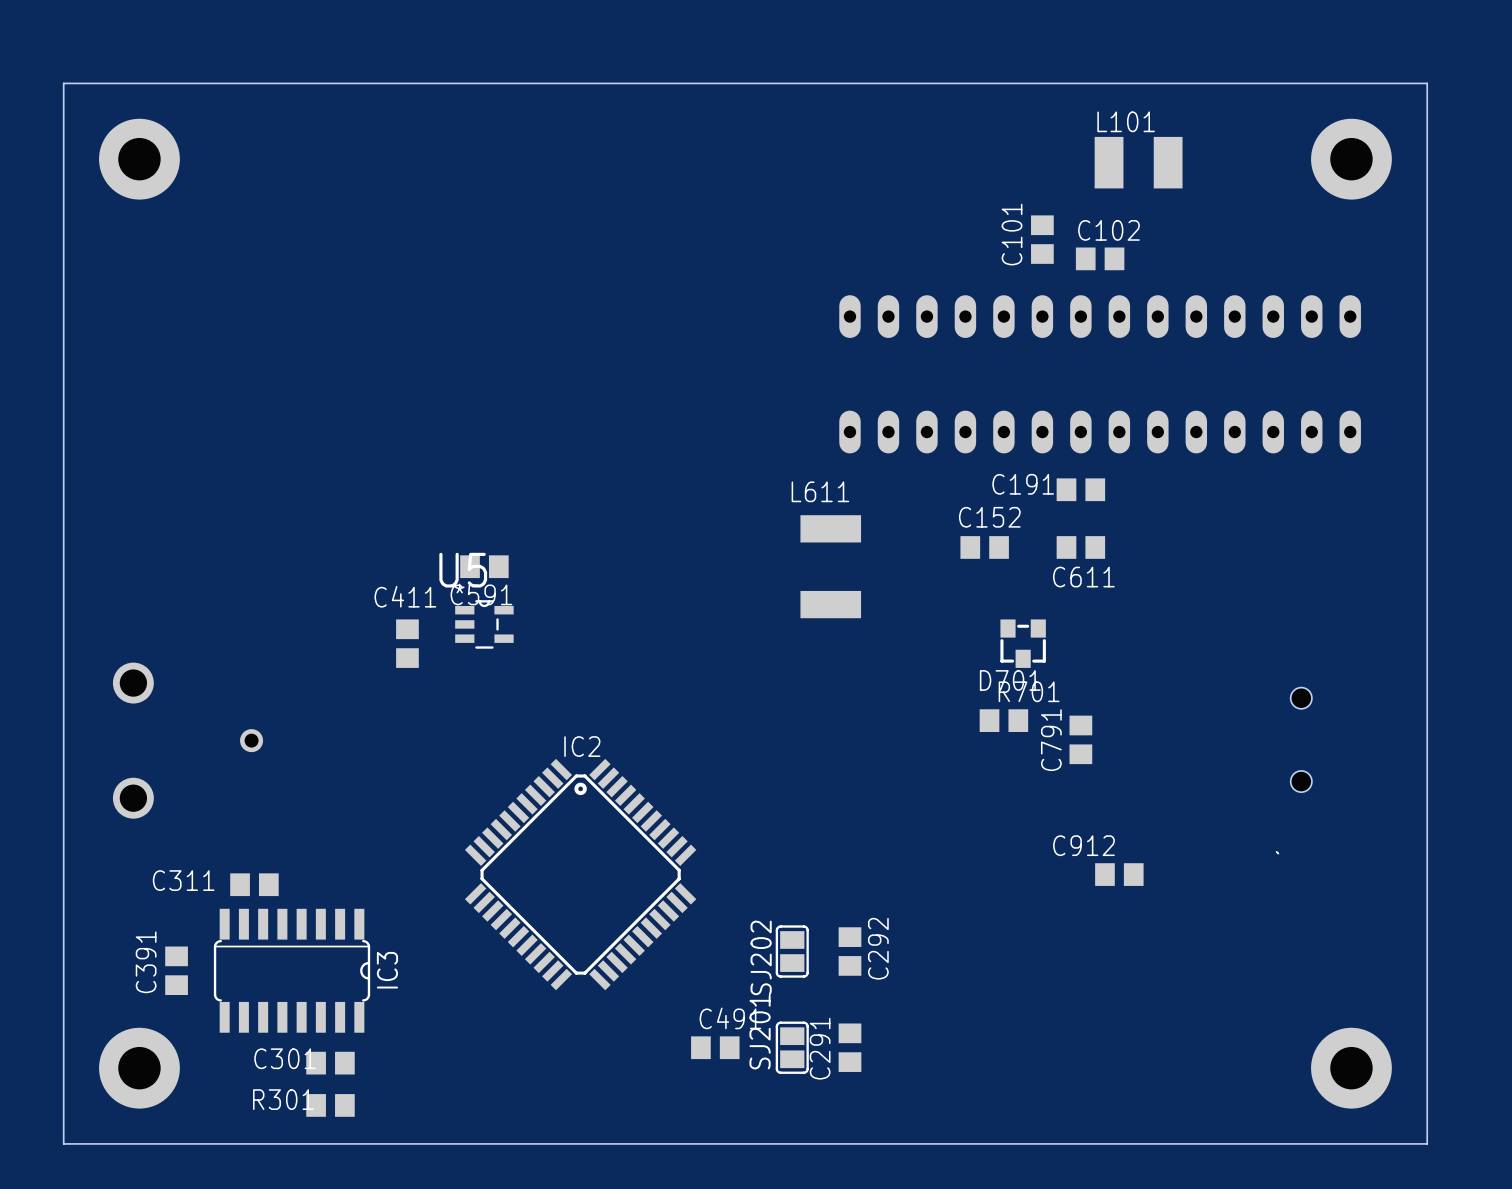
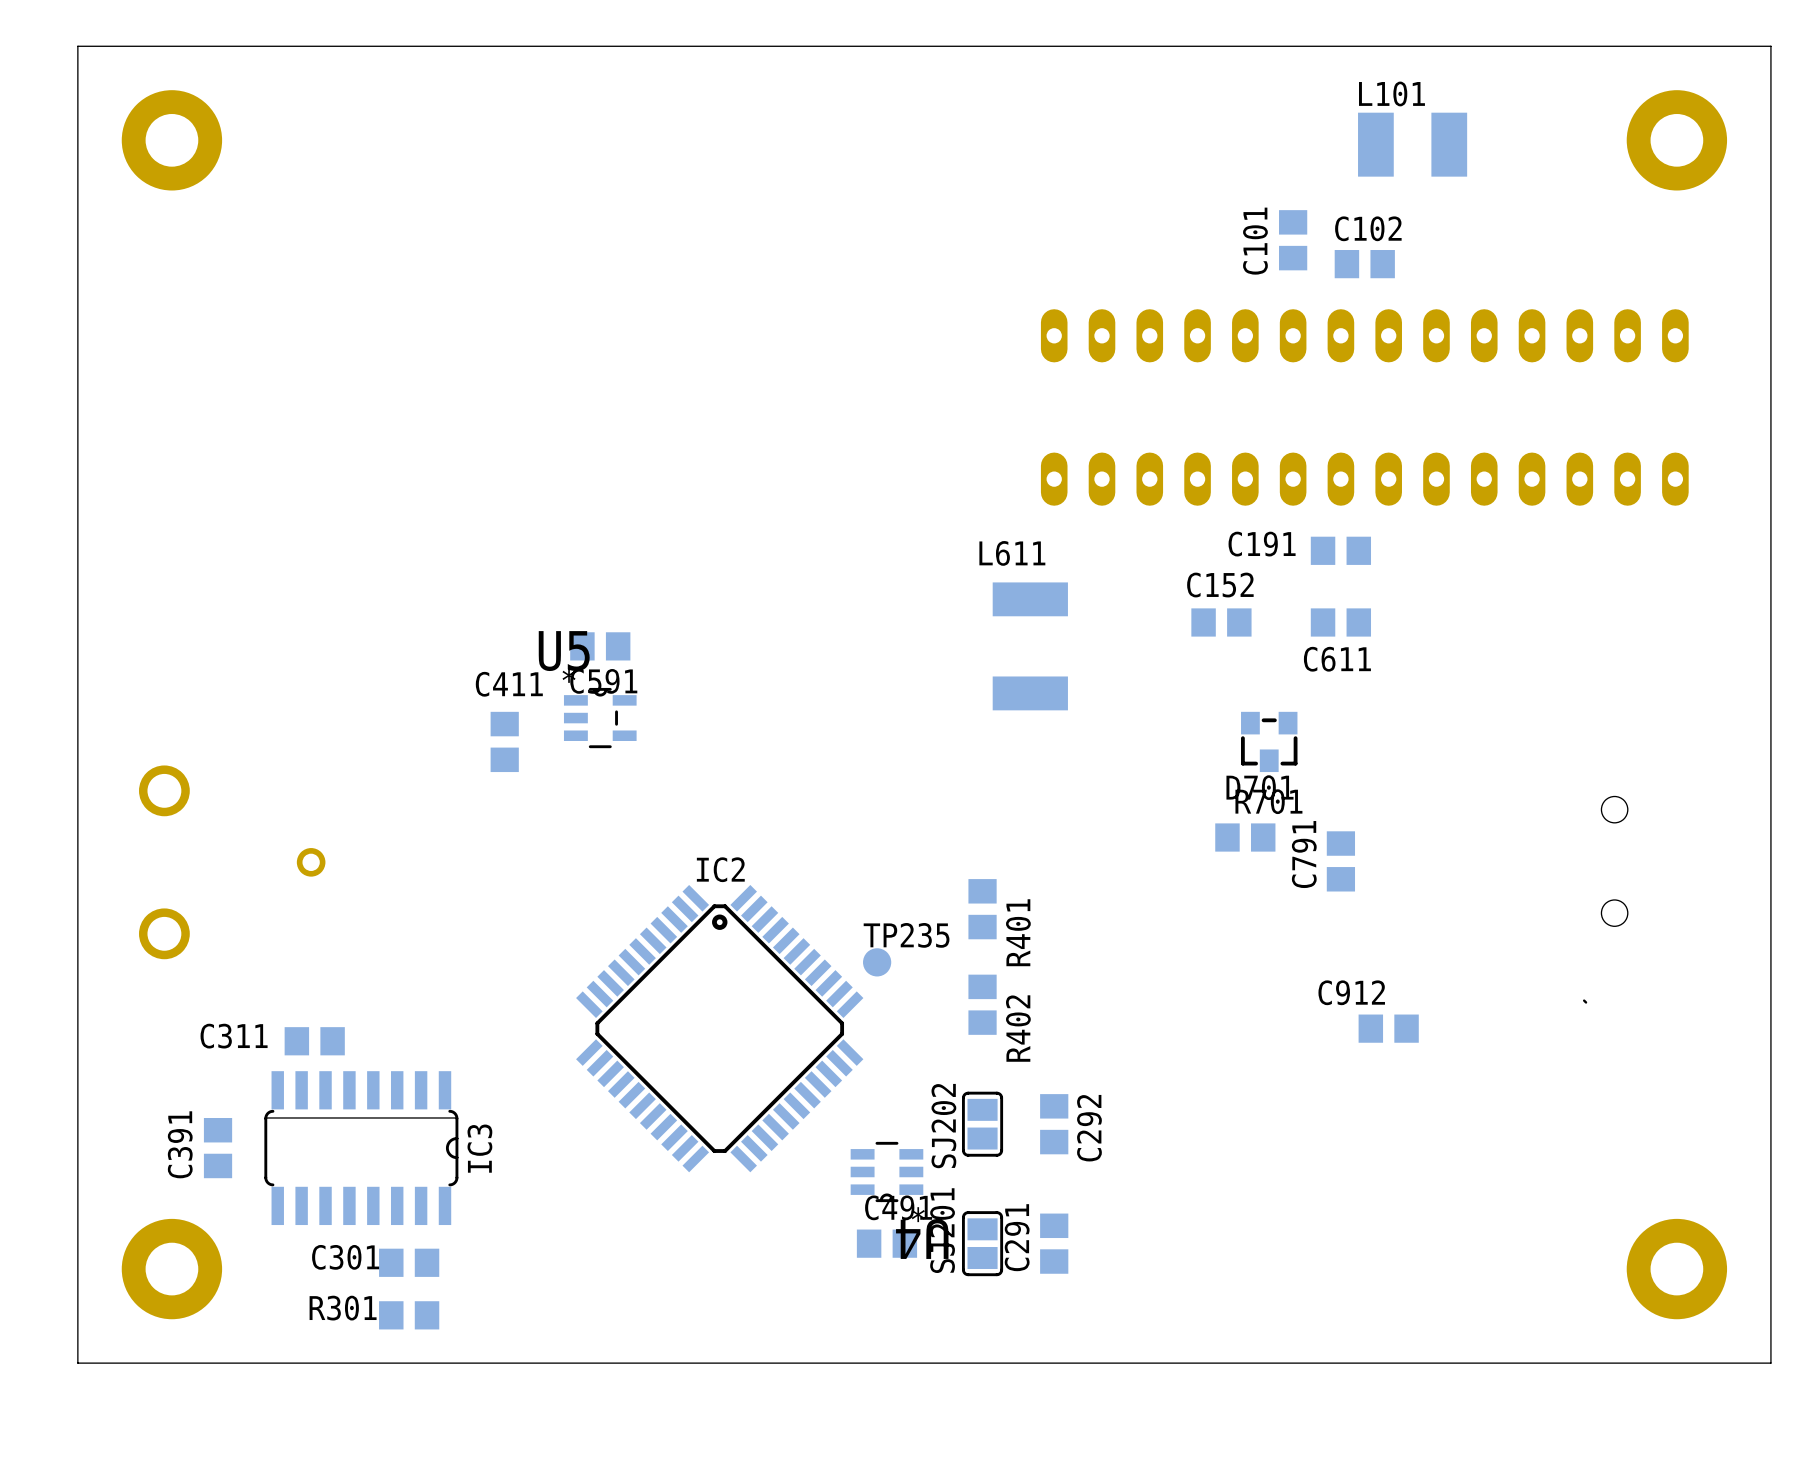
R401: none -> (982, 909)
TP235: none -> (877, 962)
R402: none -> (982, 1004)
U4: none -> (886, 1171)

